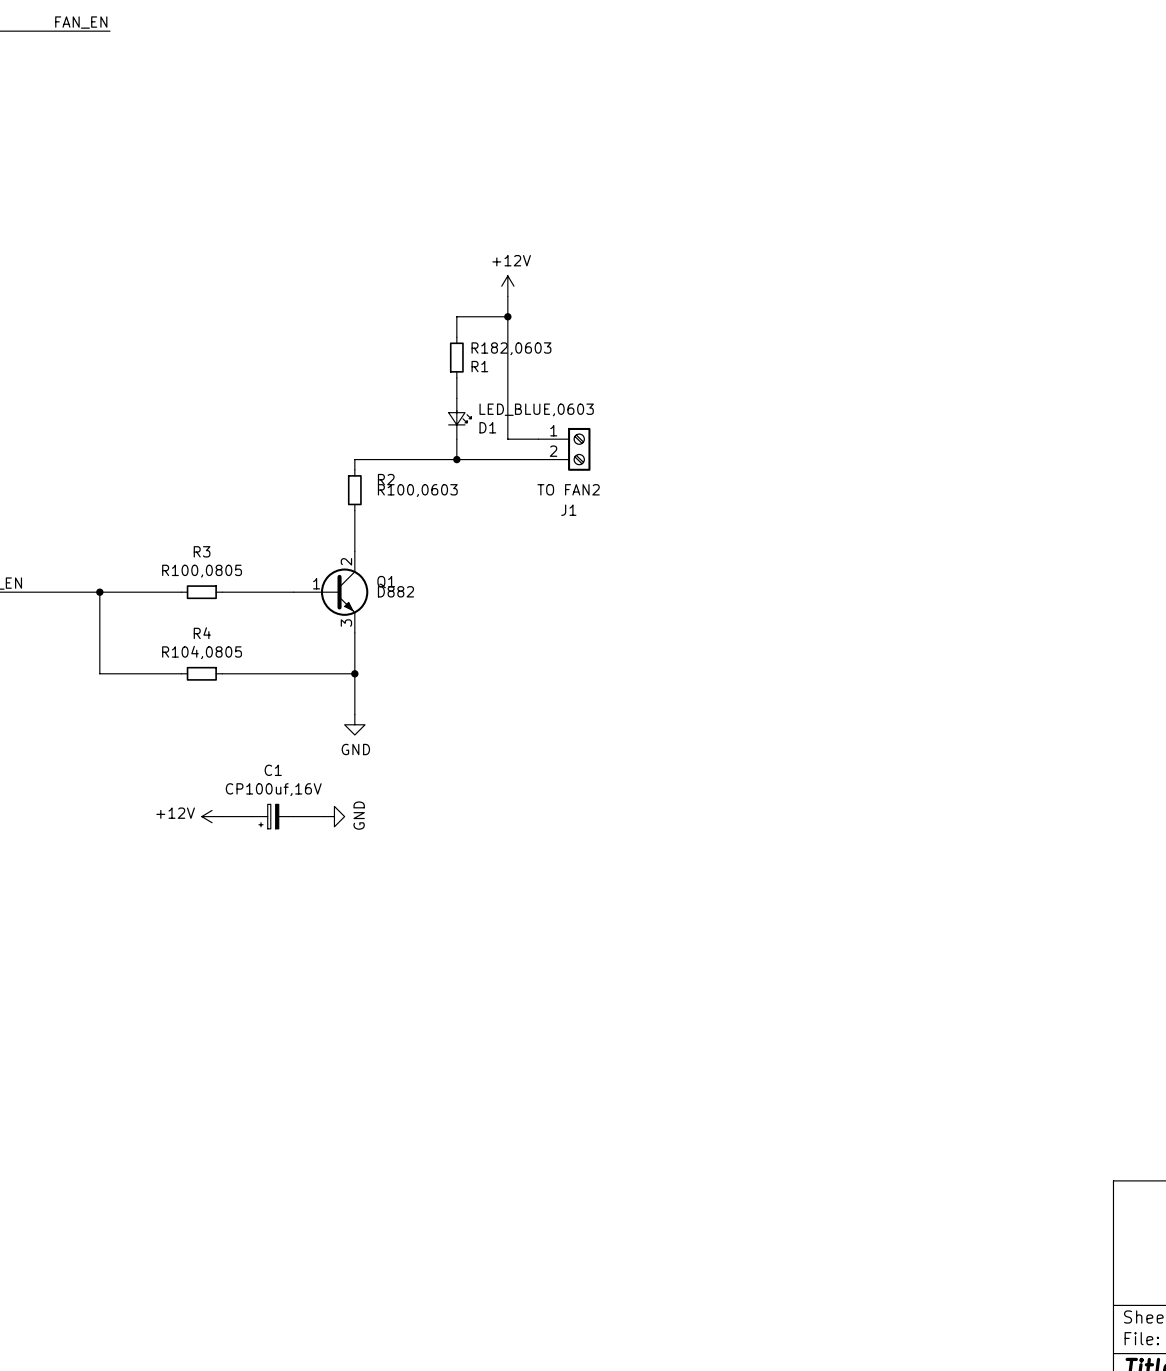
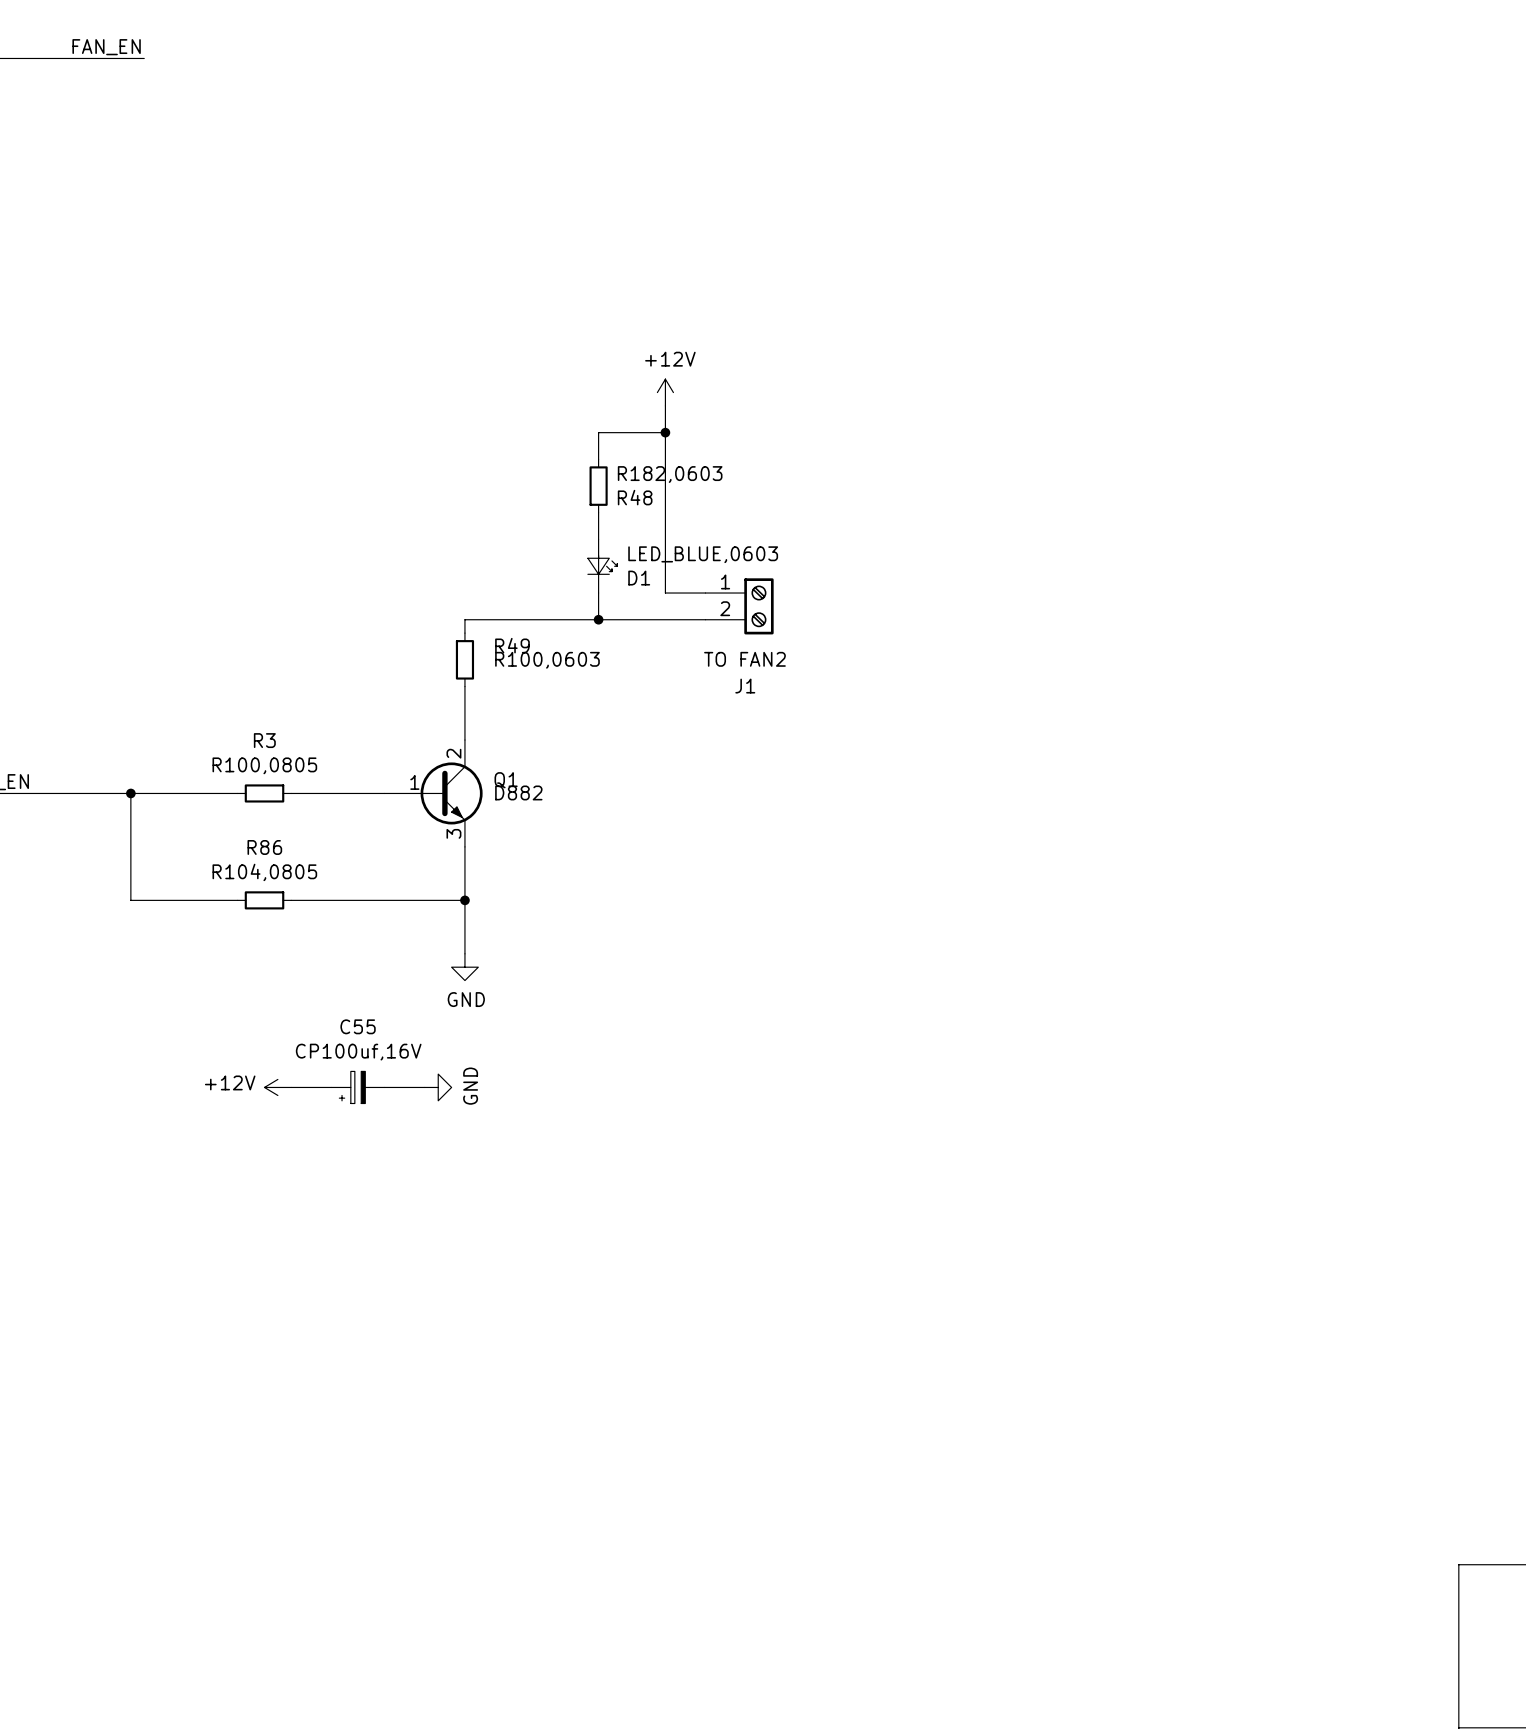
R1 name: R1 (479, 366) -> R48 (635, 497)
R2 name: R2 (386, 479) -> R49 (512, 645)
R4 name: R4 (202, 633) -> R86 (264, 847)
C1 name: C1 (273, 770) -> C55 (358, 1026)

